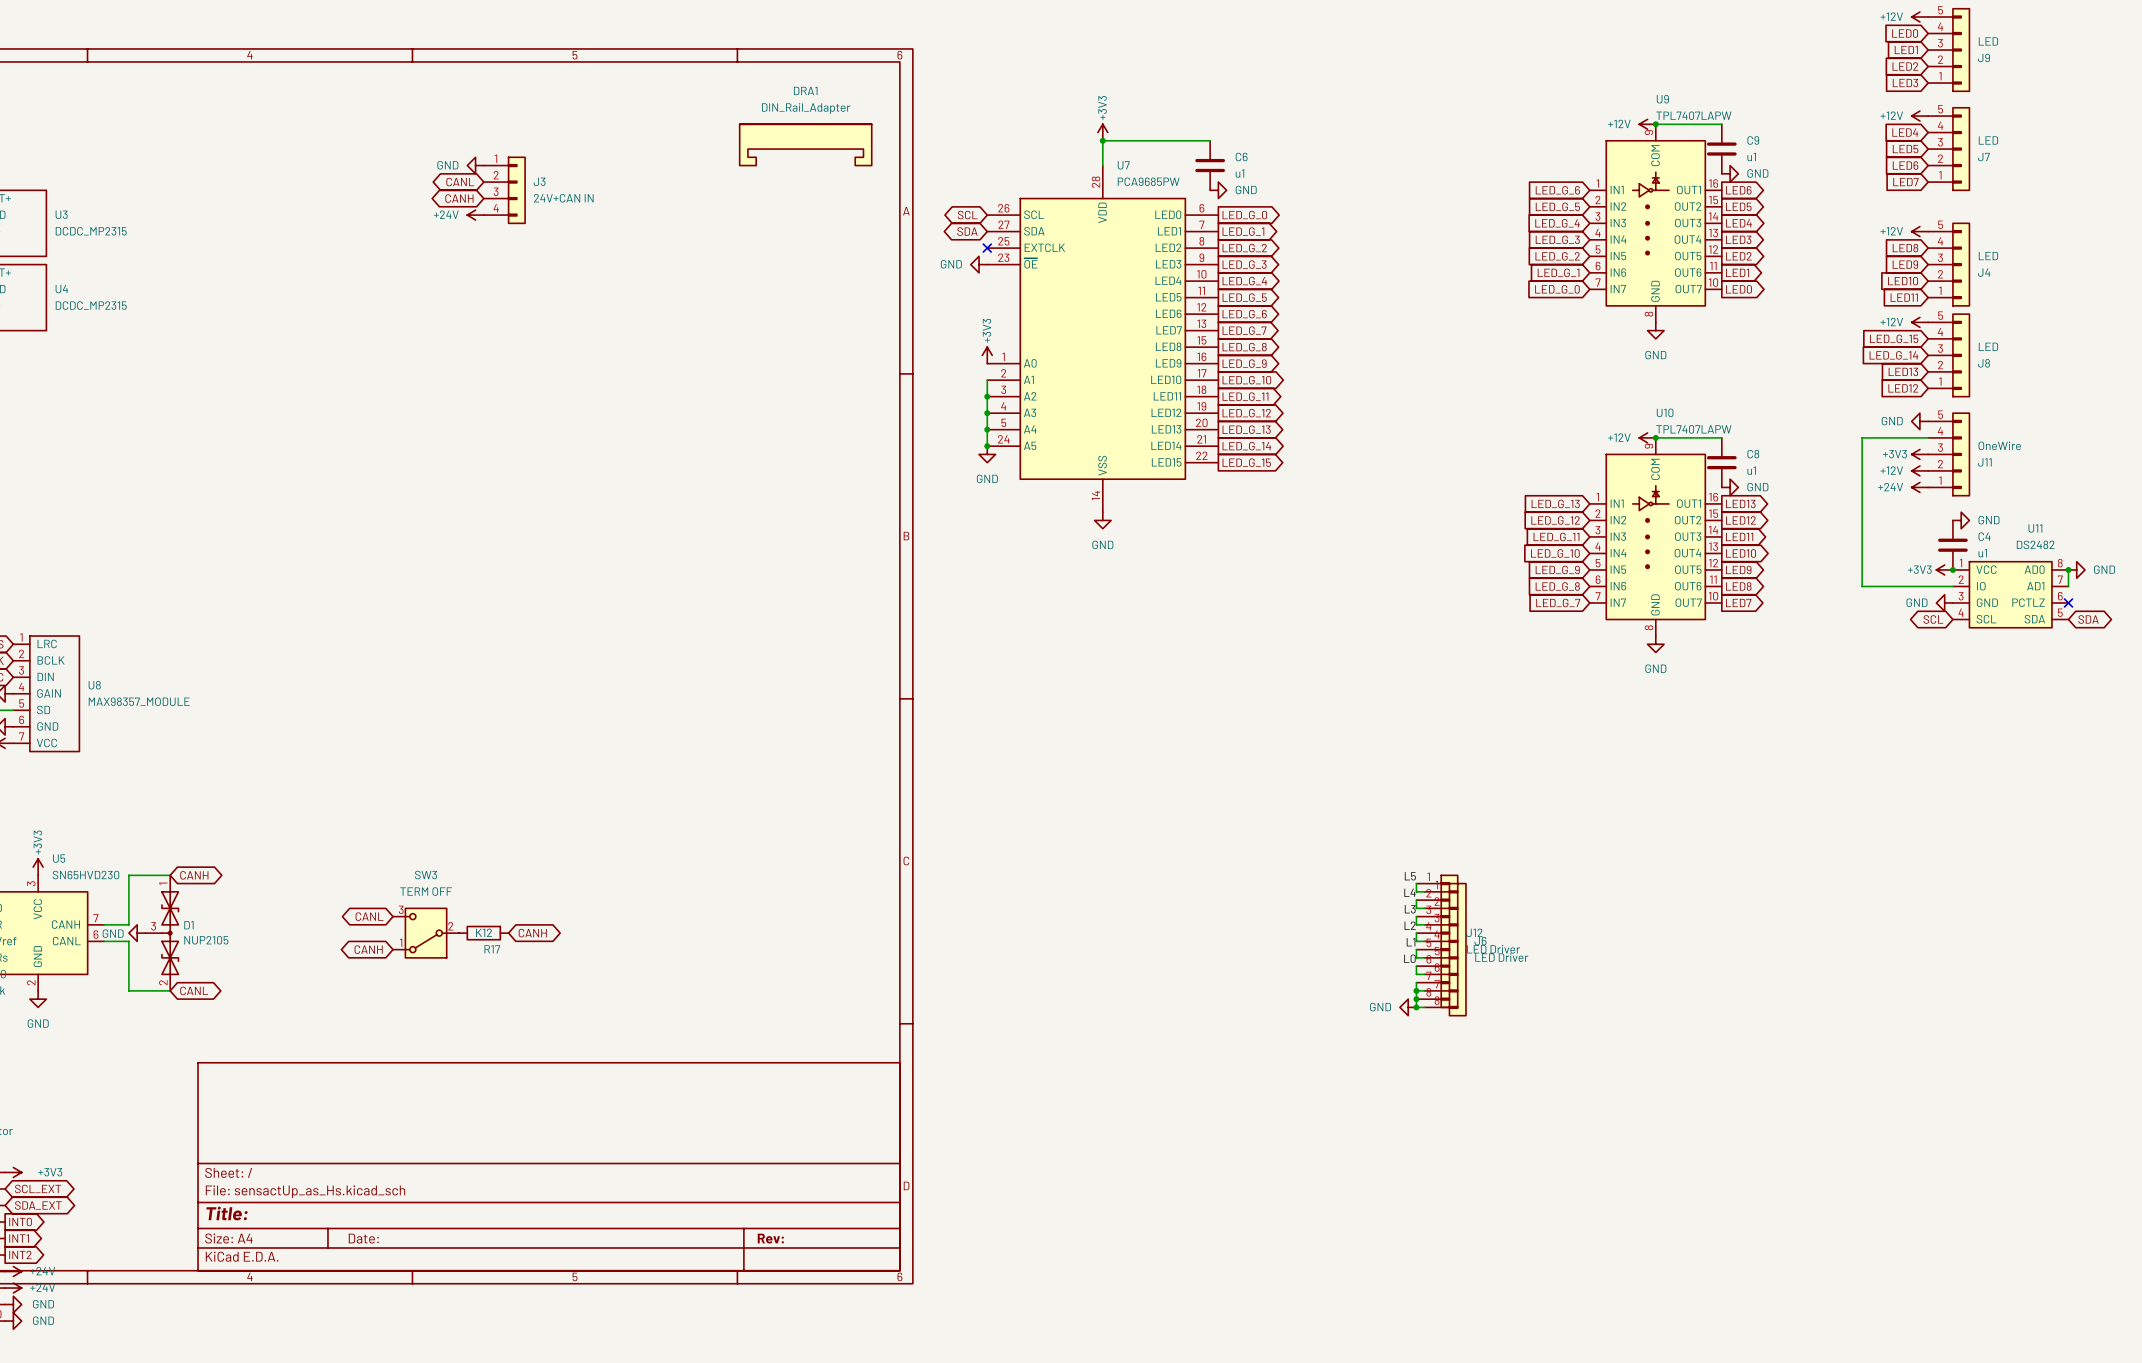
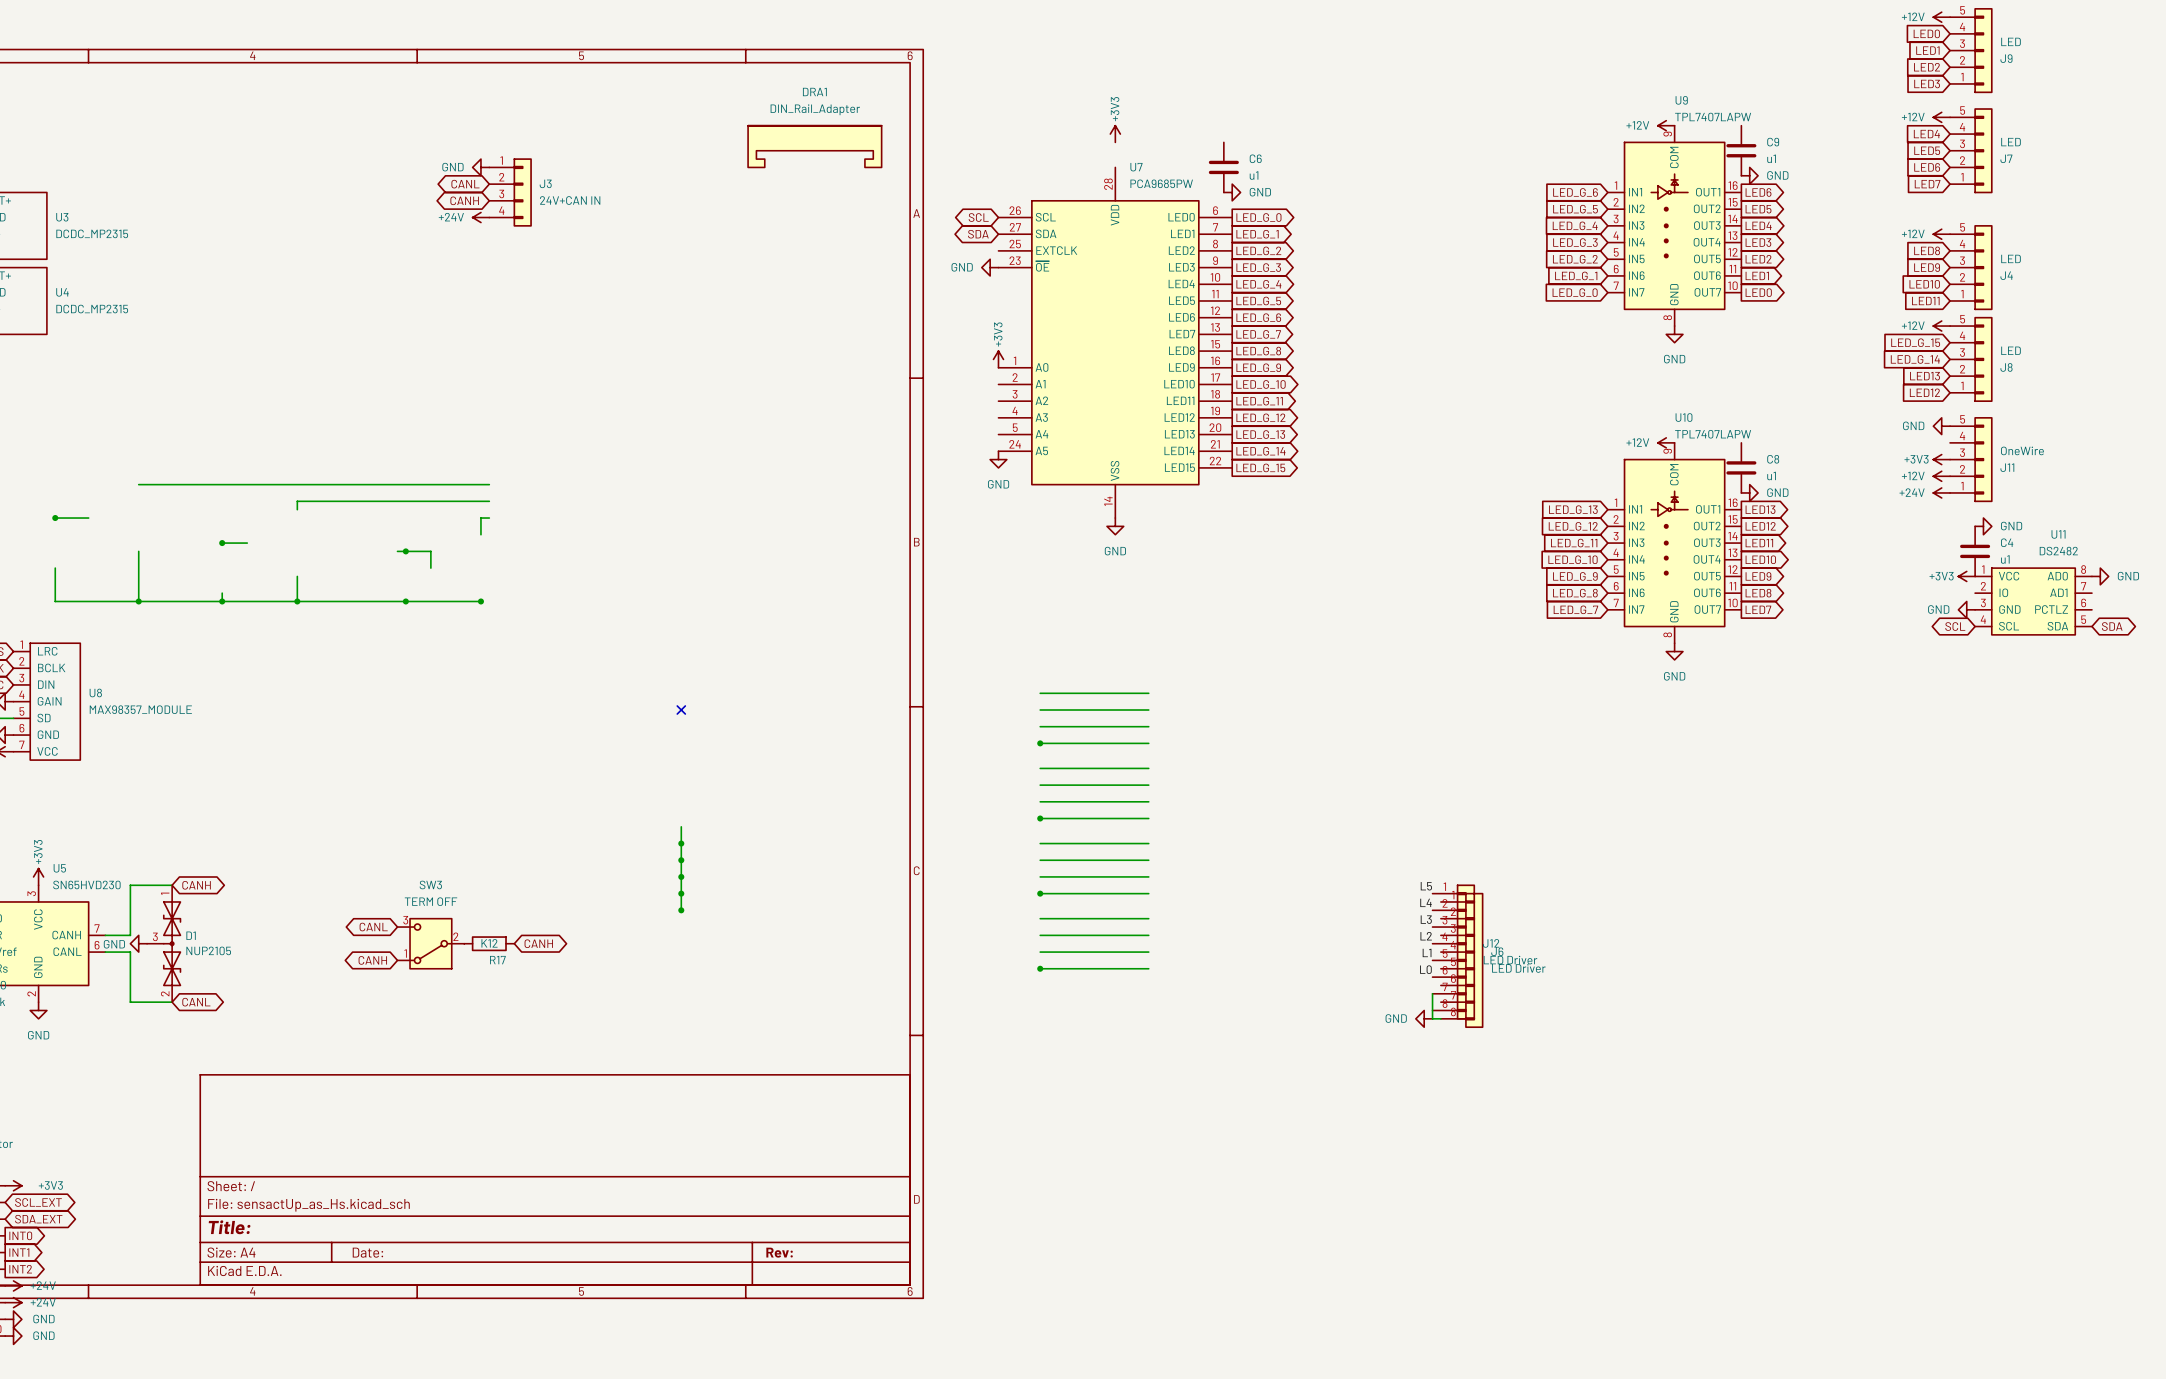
wire: (1655, 124) (1721, 124) -> none
junction: (1655, 124) -> none
junction: (1102, 140) -> none
wire: (1210, 140) (1102, 140) (1102, 165) -> none
no-connect mark: (987, 248) -> none
wire: (987, 380) (987, 446) -> none
junction: (987, 396) -> none
junction: (987, 413) -> none
junction: (987, 429) -> none
wire: (1655, 437) (1721, 437) -> none
junction: (1655, 437) -> none
wire: (1928, 437) (1862, 437) (1862, 586) (1952, 586) -> none
junction: (987, 446) -> none
wire: none -> (138, 484) (489, 484)
wire: none -> (489, 501) (297, 501) (297, 509)
wire: none -> (55, 518) (88, 518)
junction: none -> (55, 518)
wire: none -> (489, 518) (480, 518) (480, 534)
wire: none -> (222, 543) (247, 543)
junction: none -> (222, 543)
wire: none -> (138, 551) (138, 601)
wire: none -> (397, 551) (430, 551) (430, 568)
junction: none -> (405, 551)
wire: none -> (55, 568) (55, 601) (480, 601)
wire: none -> (297, 576) (297, 601)
junction: (1952, 569) -> none
wire: (2068, 569) (2068, 586) -> none
junction: (2068, 569) -> none
wire: none -> (222, 593) (222, 601)
junction: none -> (138, 601)
junction: none -> (222, 601)
junction: none -> (297, 601)
junction: none -> (405, 601)
junction: none -> (480, 601)
no-connect mark: (2068, 602) -> none
wire: none -> (1040, 693) (1148, 693)
no-connect mark: none -> (681, 710)
wire: none -> (1040, 710) (1148, 710)
wire: none -> (1040, 726) (1148, 726)
wire: none -> (1040, 743) (1148, 743)
junction: none -> (1040, 743)
wire: none -> (1040, 768) (1148, 768)
wire: none -> (1040, 785) (1148, 785)
wire: none -> (1040, 801) (1148, 801)
wire: none -> (1040, 818) (1148, 818)
junction: none -> (1040, 818)
wire: none -> (681, 826) (681, 910)
junction: none -> (681, 843)
wire: none -> (1040, 843) (1148, 843)
junction: none -> (681, 860)
wire: none -> (1040, 860) (1148, 860)
junction: none -> (681, 876)
wire: none -> (1040, 876) (1148, 876)
junction: none -> (681, 893)
wire: none -> (1040, 893) (1148, 893)
junction: none -> (1040, 893)
wire: (1416, 883) (1416, 891) (1424, 891) -> none
junction: none -> (681, 910)
wire: (1416, 900) (1416, 908) (1424, 908) -> none
wire: none -> (1040, 918) (1148, 918)
wire: (1416, 916) (1416, 924) (1424, 924) -> none
wire: none -> (1040, 935) (1148, 935)
wire: (1416, 933) (1416, 941) (1424, 941) -> none
wire: none -> (1040, 952) (1148, 952)
wire: (1416, 949) (1416, 957) (1424, 957) -> none
wire: none -> (1040, 968) (1148, 968)
junction: none -> (1040, 968)
wire: (1416, 966) (1416, 974) (1424, 974) -> none
wire: (1416, 990) (1424, 990) -> none
junction: (1416, 990) -> none
junction: (1416, 999) -> none
junction: (1416, 1007) -> none

